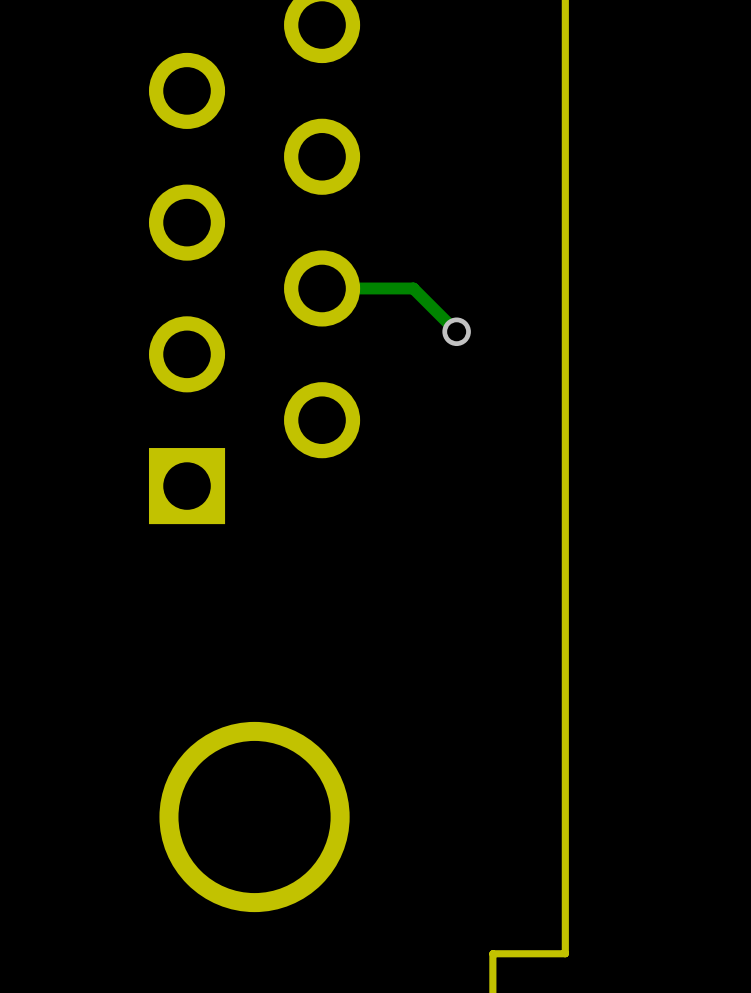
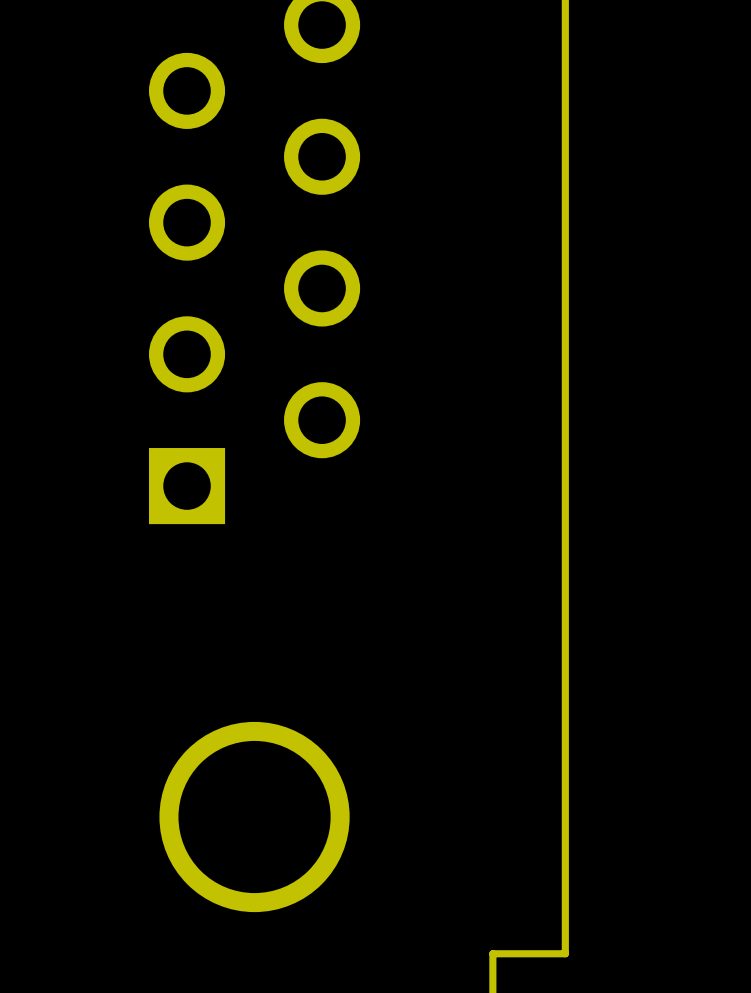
track: (322, 288) (413, 288) (456, 331) -> none
via: (456, 331) -> none

